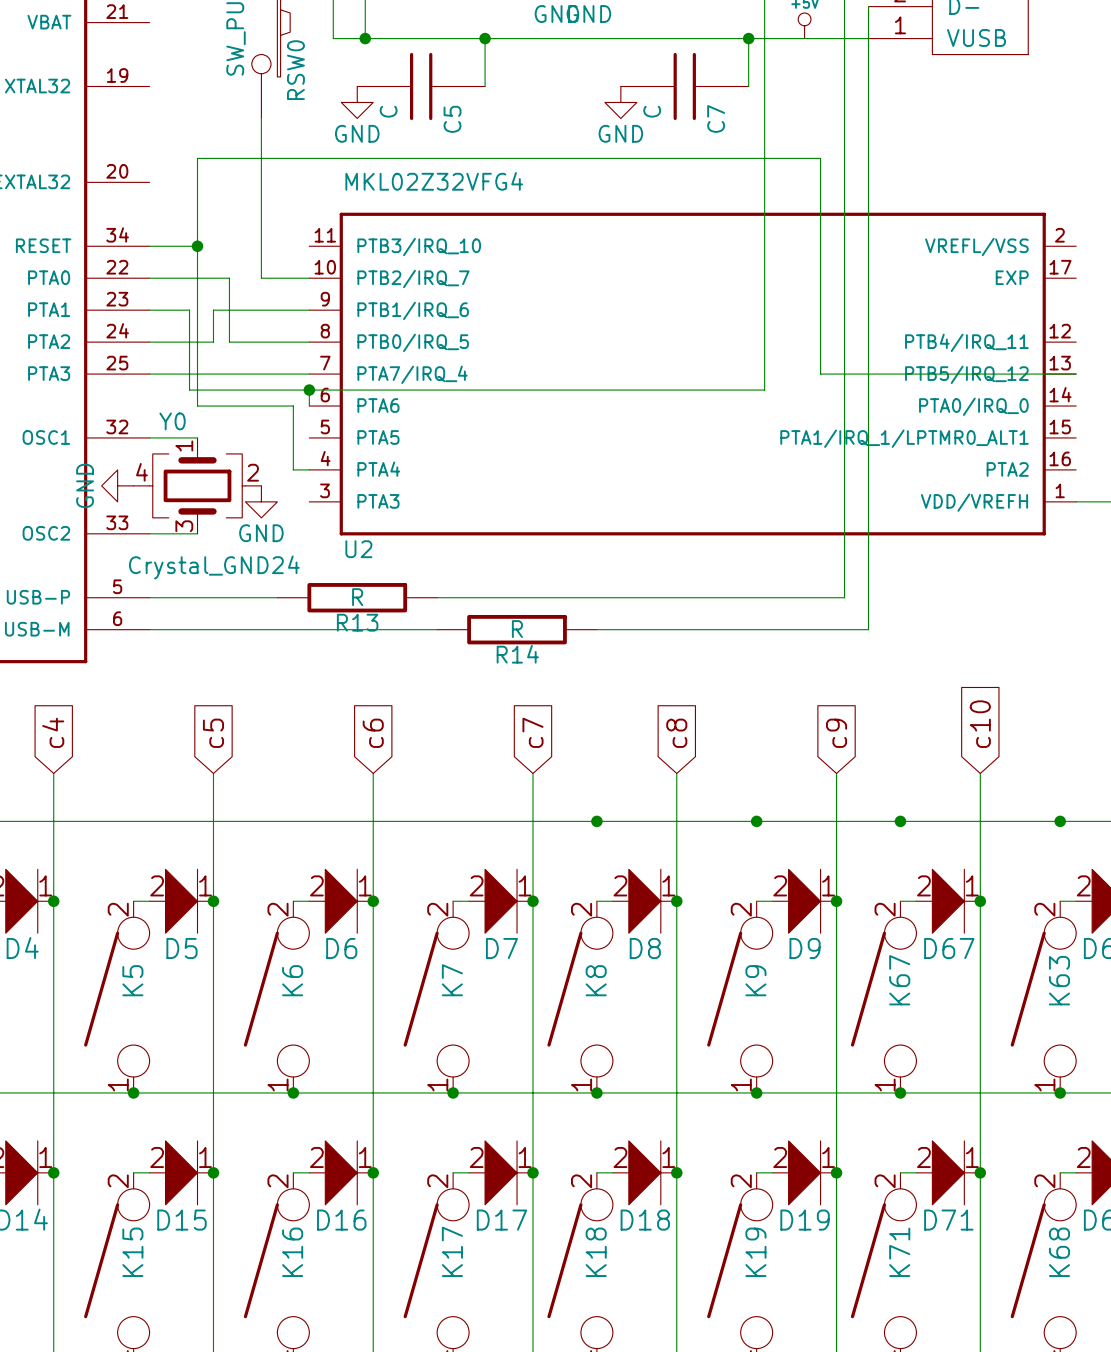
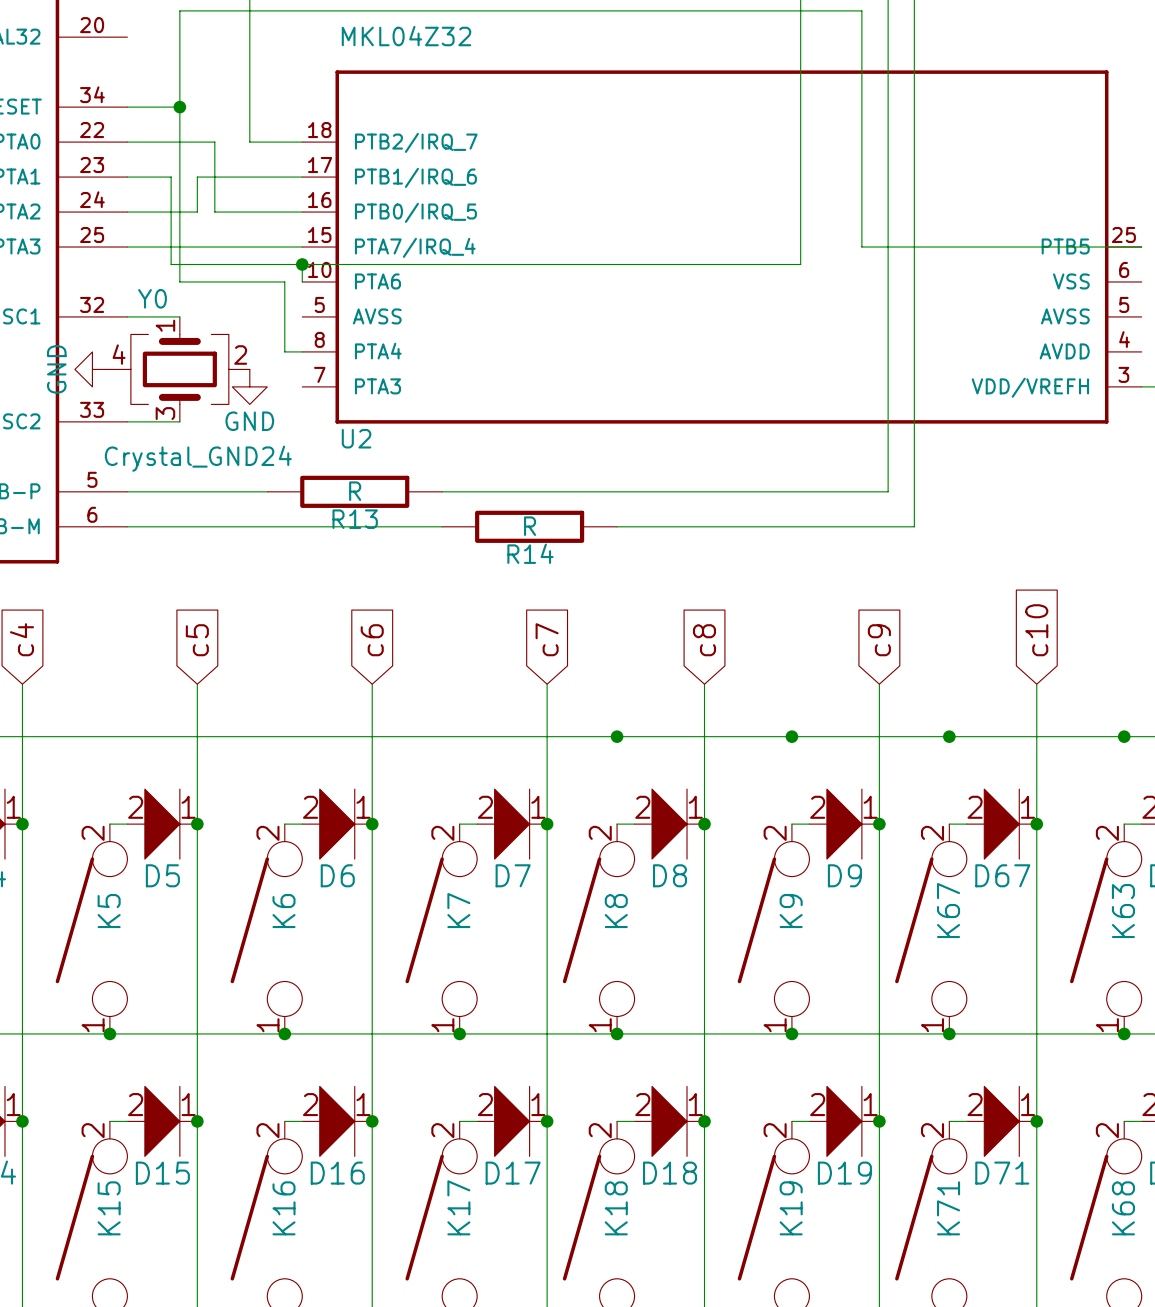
U2 value: MKL02Z32VFG4 (434, 181) -> MKL04Z32 (406, 36)
U2 symbol: [309, 212, 1077, 536] -> [302, 70, 1142, 424]

